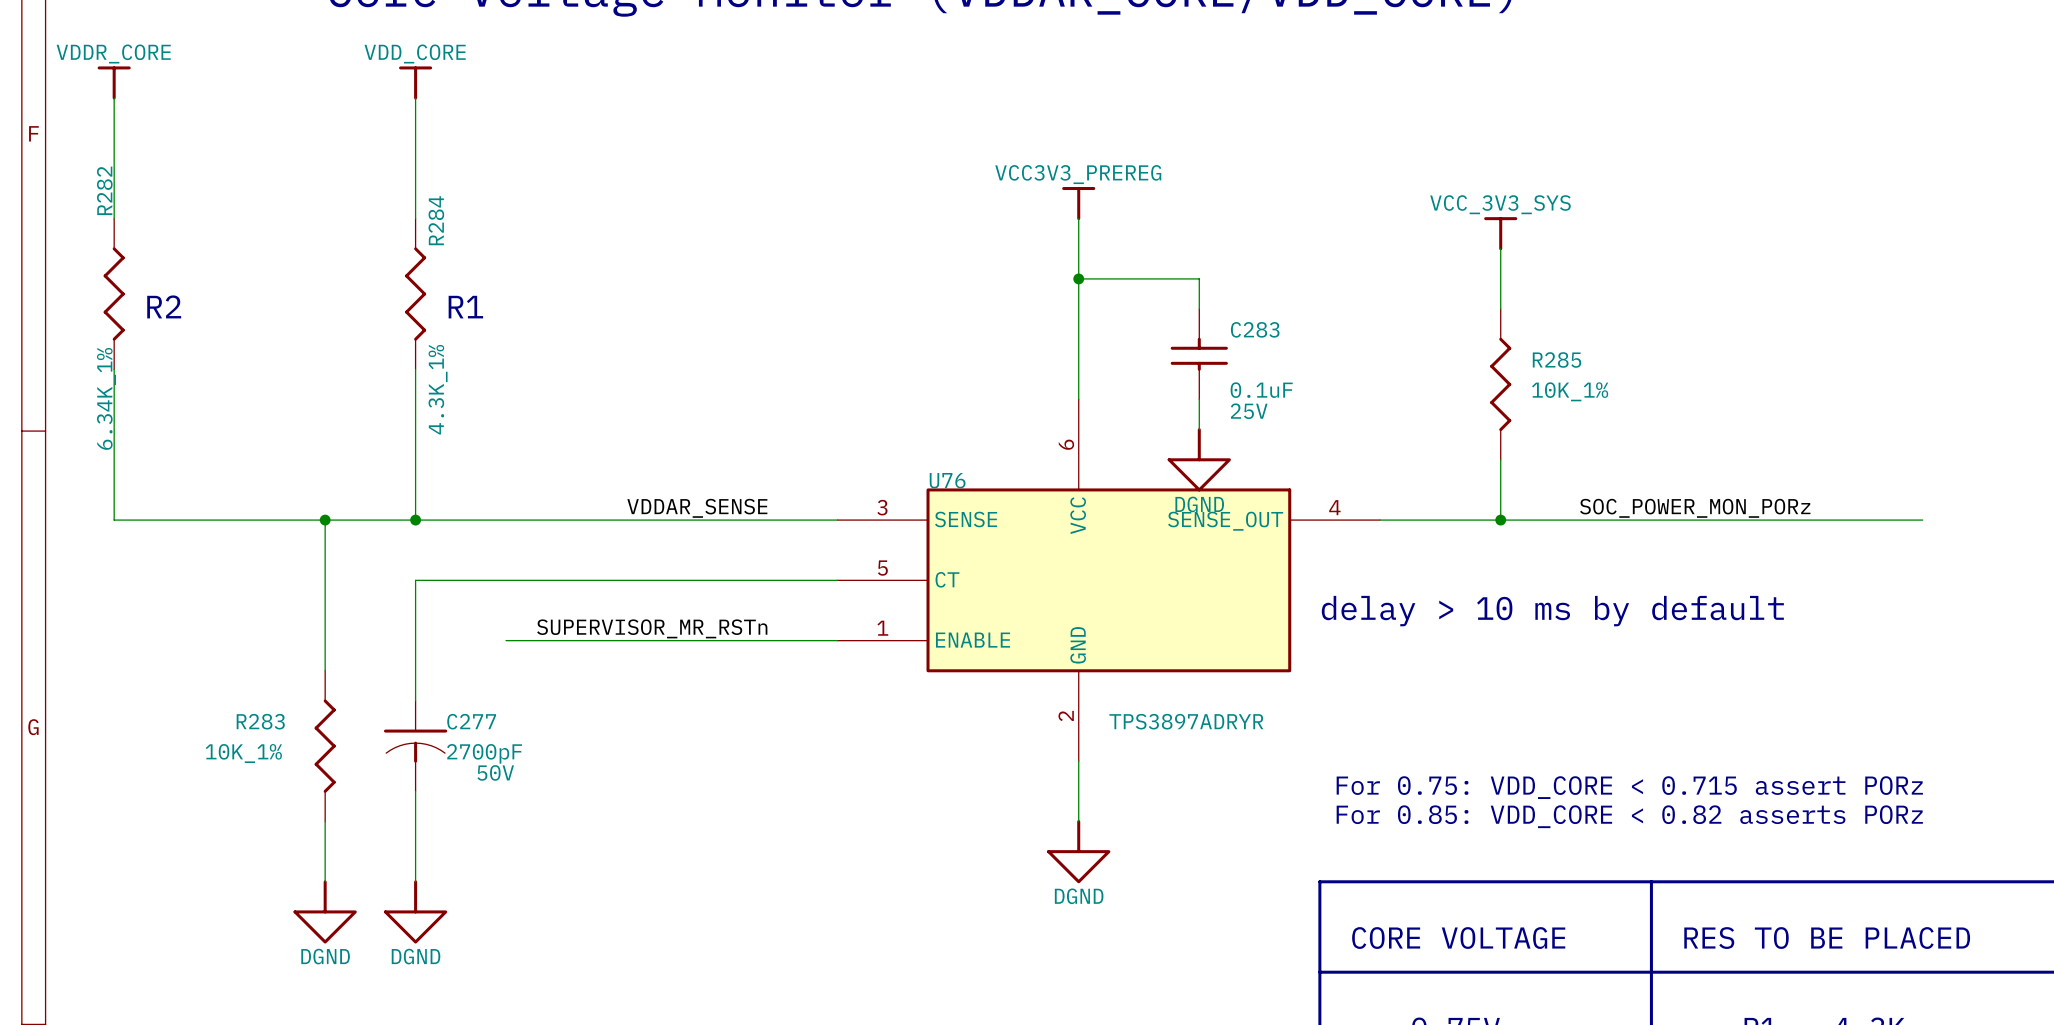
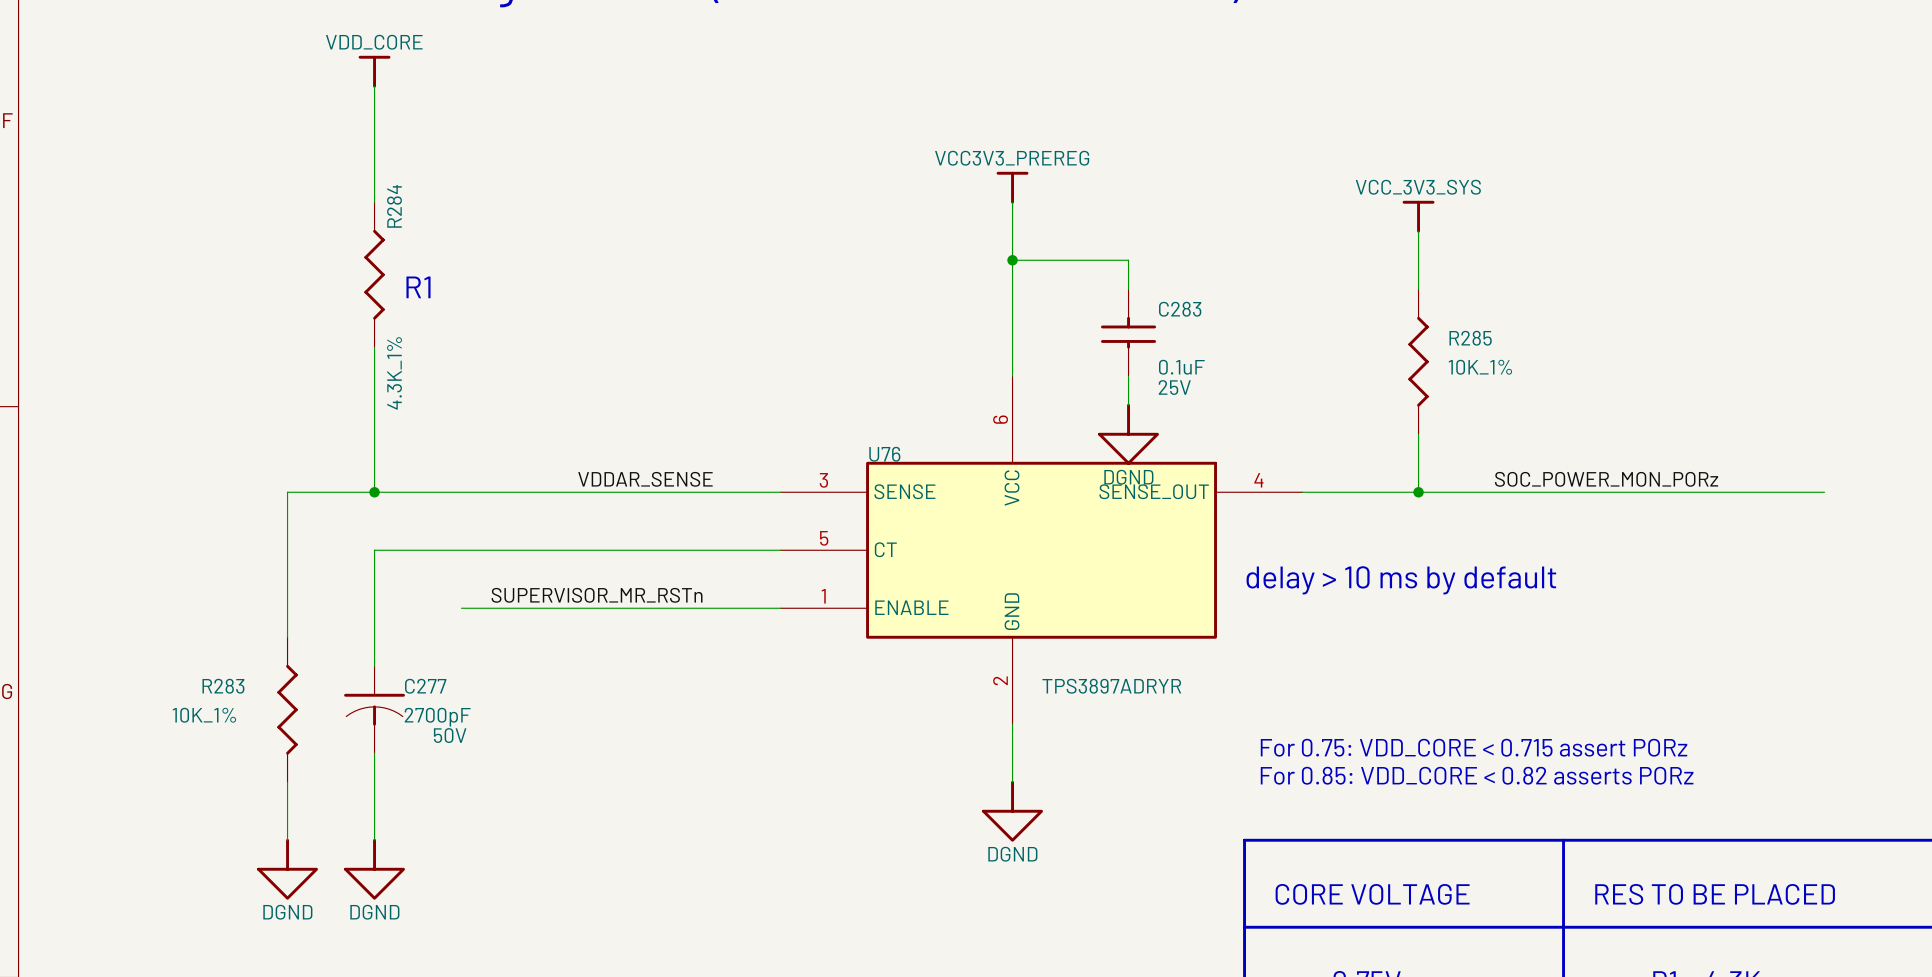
power symbol: VDDR_CORE (114, 83) -> none
wire: (114, 98) (114, 218) -> none
R282: 6.34K_1% (114, 294) -> none
text: R2 (164, 306) -> none
wire: (114, 369) (114, 520) (325, 520) -> none
junction: (325, 520) -> none

